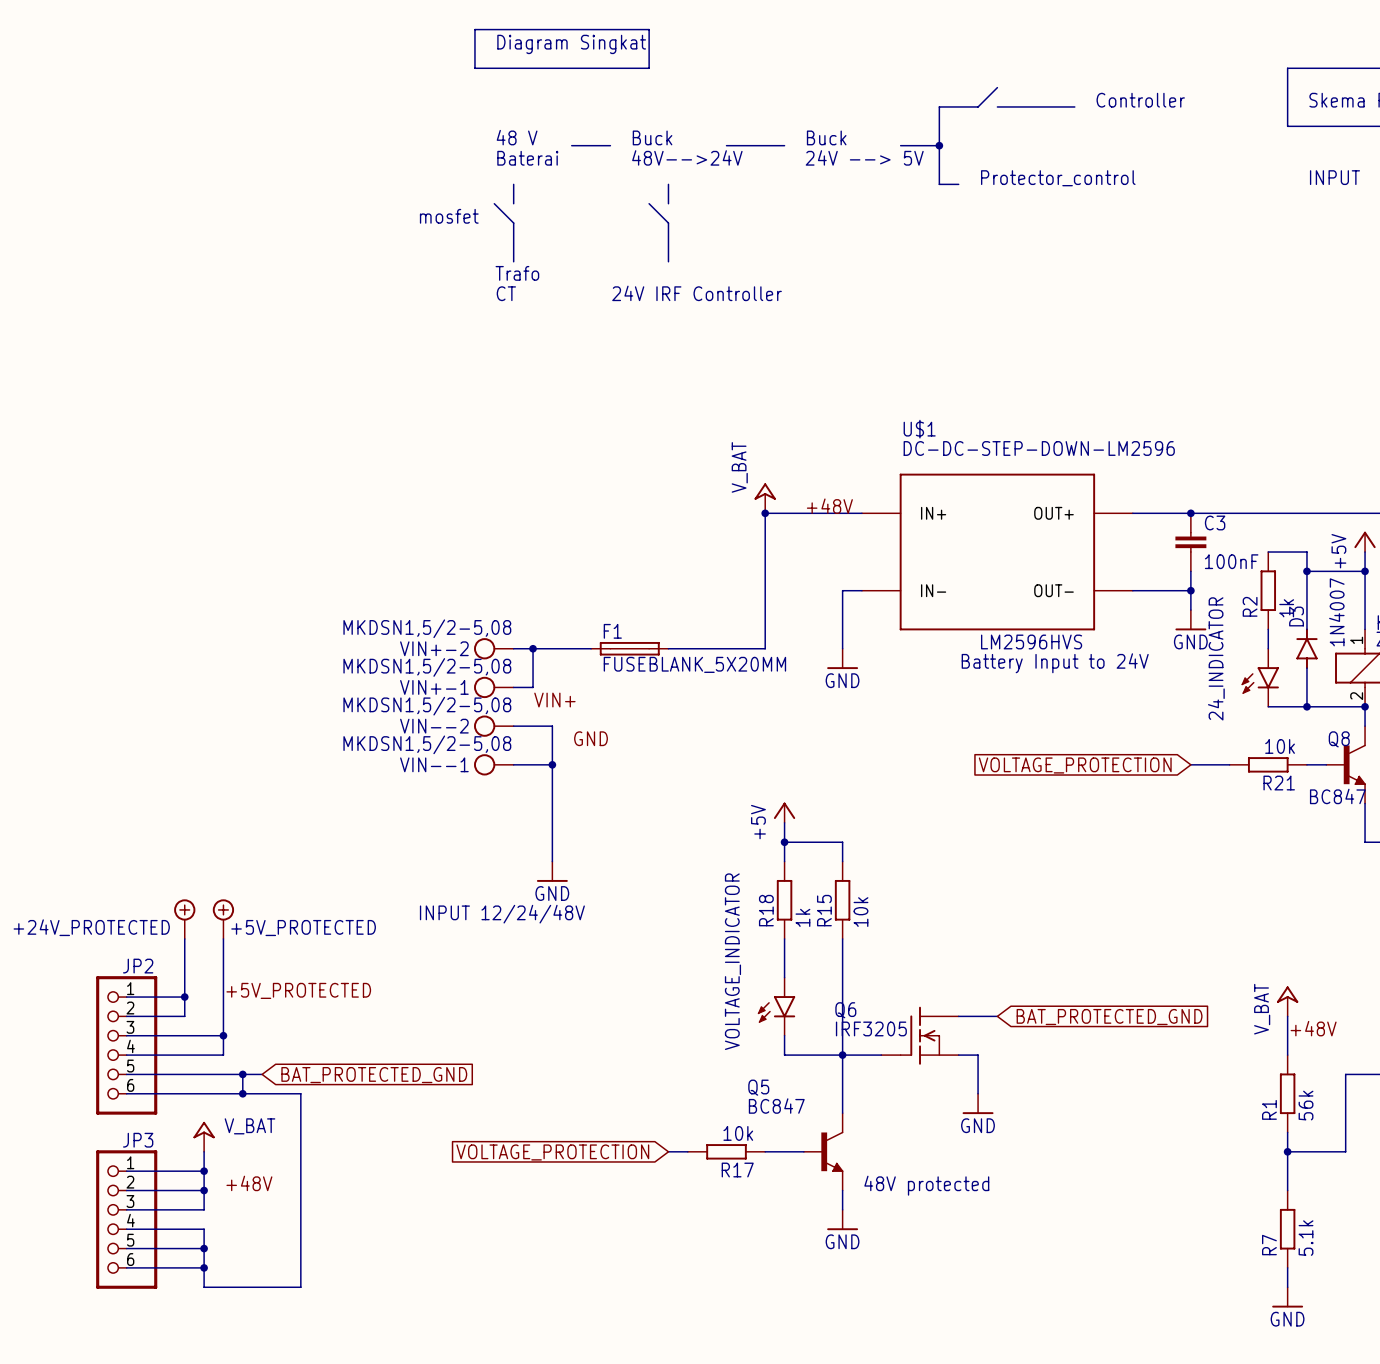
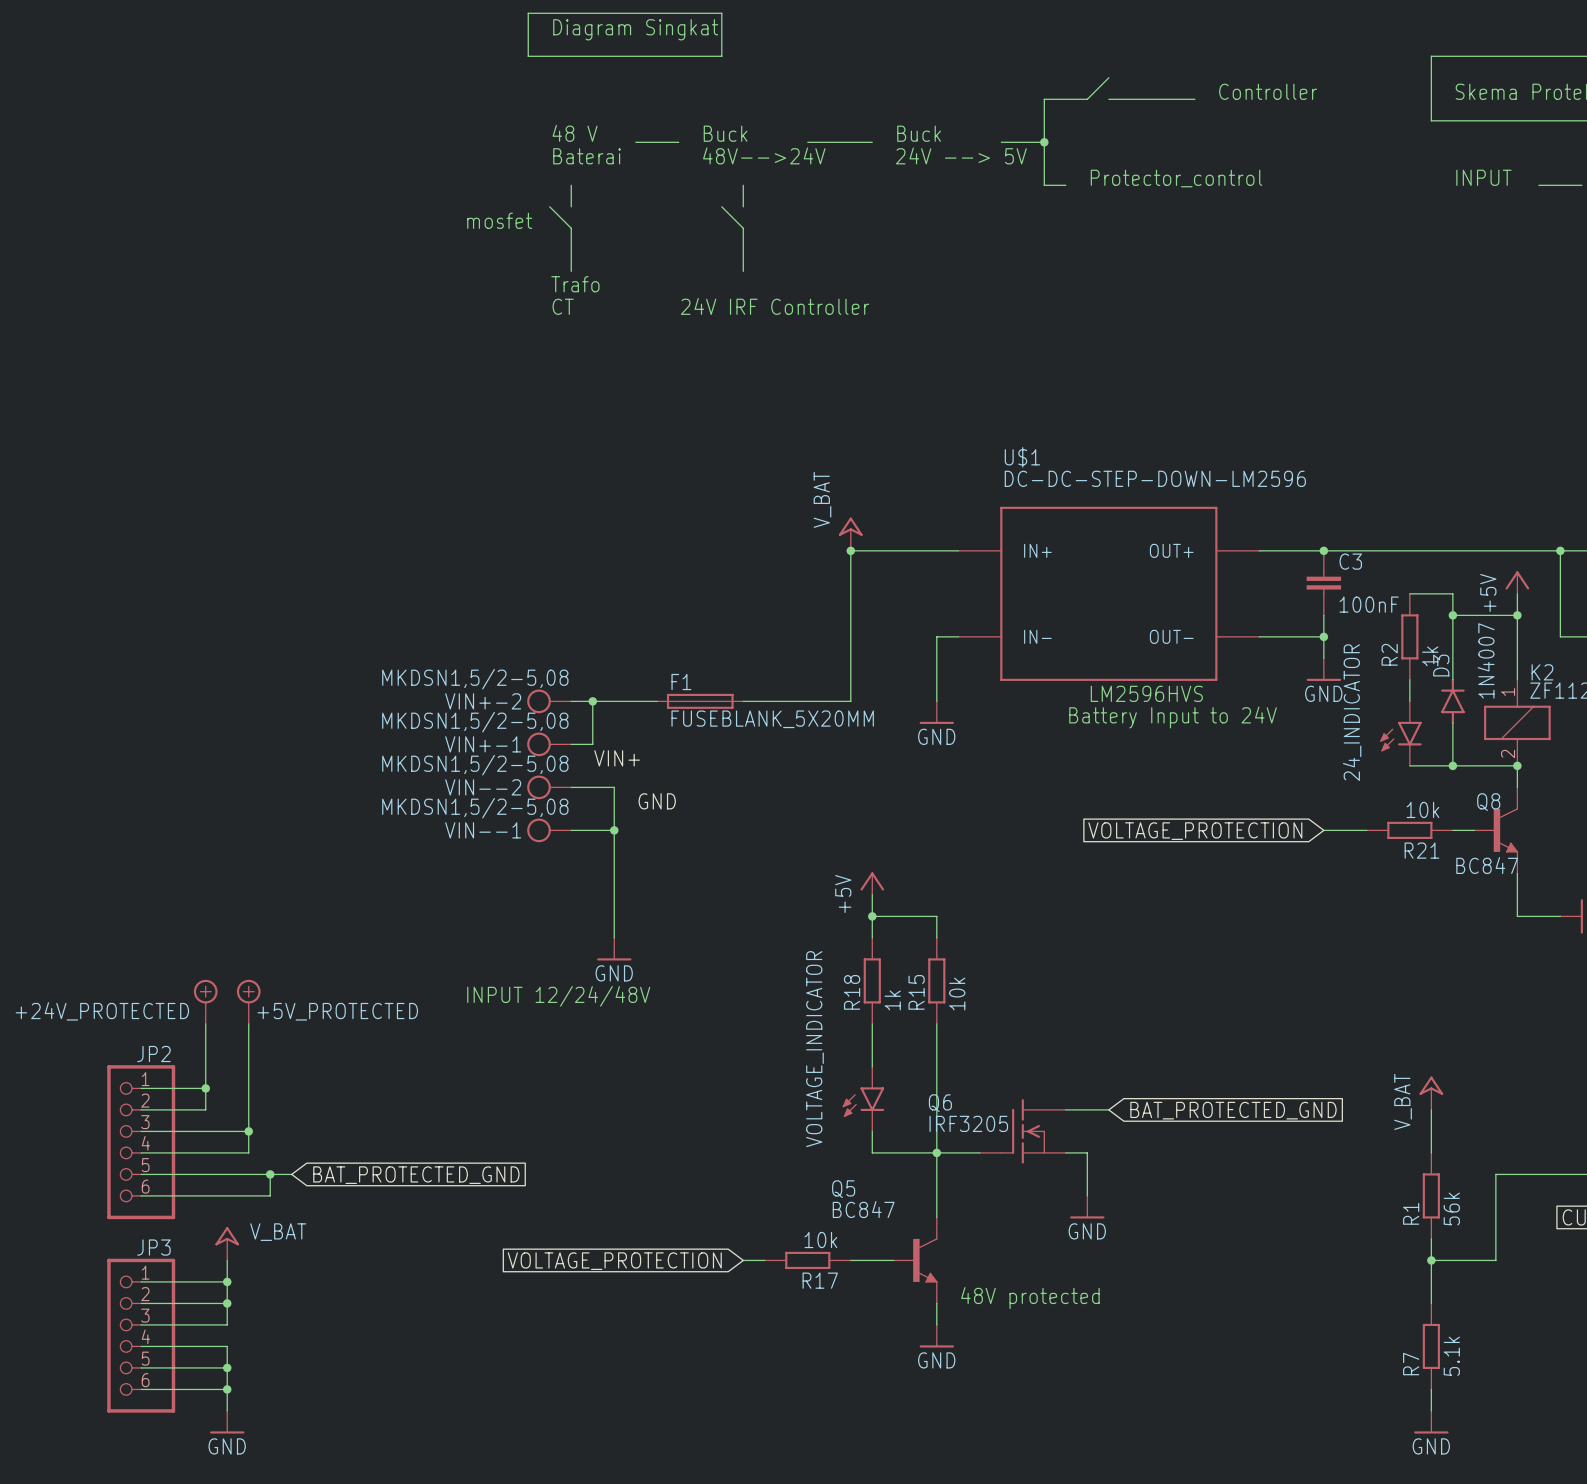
label: +48V (829, 506) -> none
label: +5V_PROTECTED (298, 990) -> none
label: +48V (1313, 1028) -> none
wire: (242, 1093) (300, 1093) (300, 1287) (204, 1287) -> none
junction: (242, 1093) -> none
label: +48V (249, 1183) -> none
power symbol: none -> GND (227, 1422)

